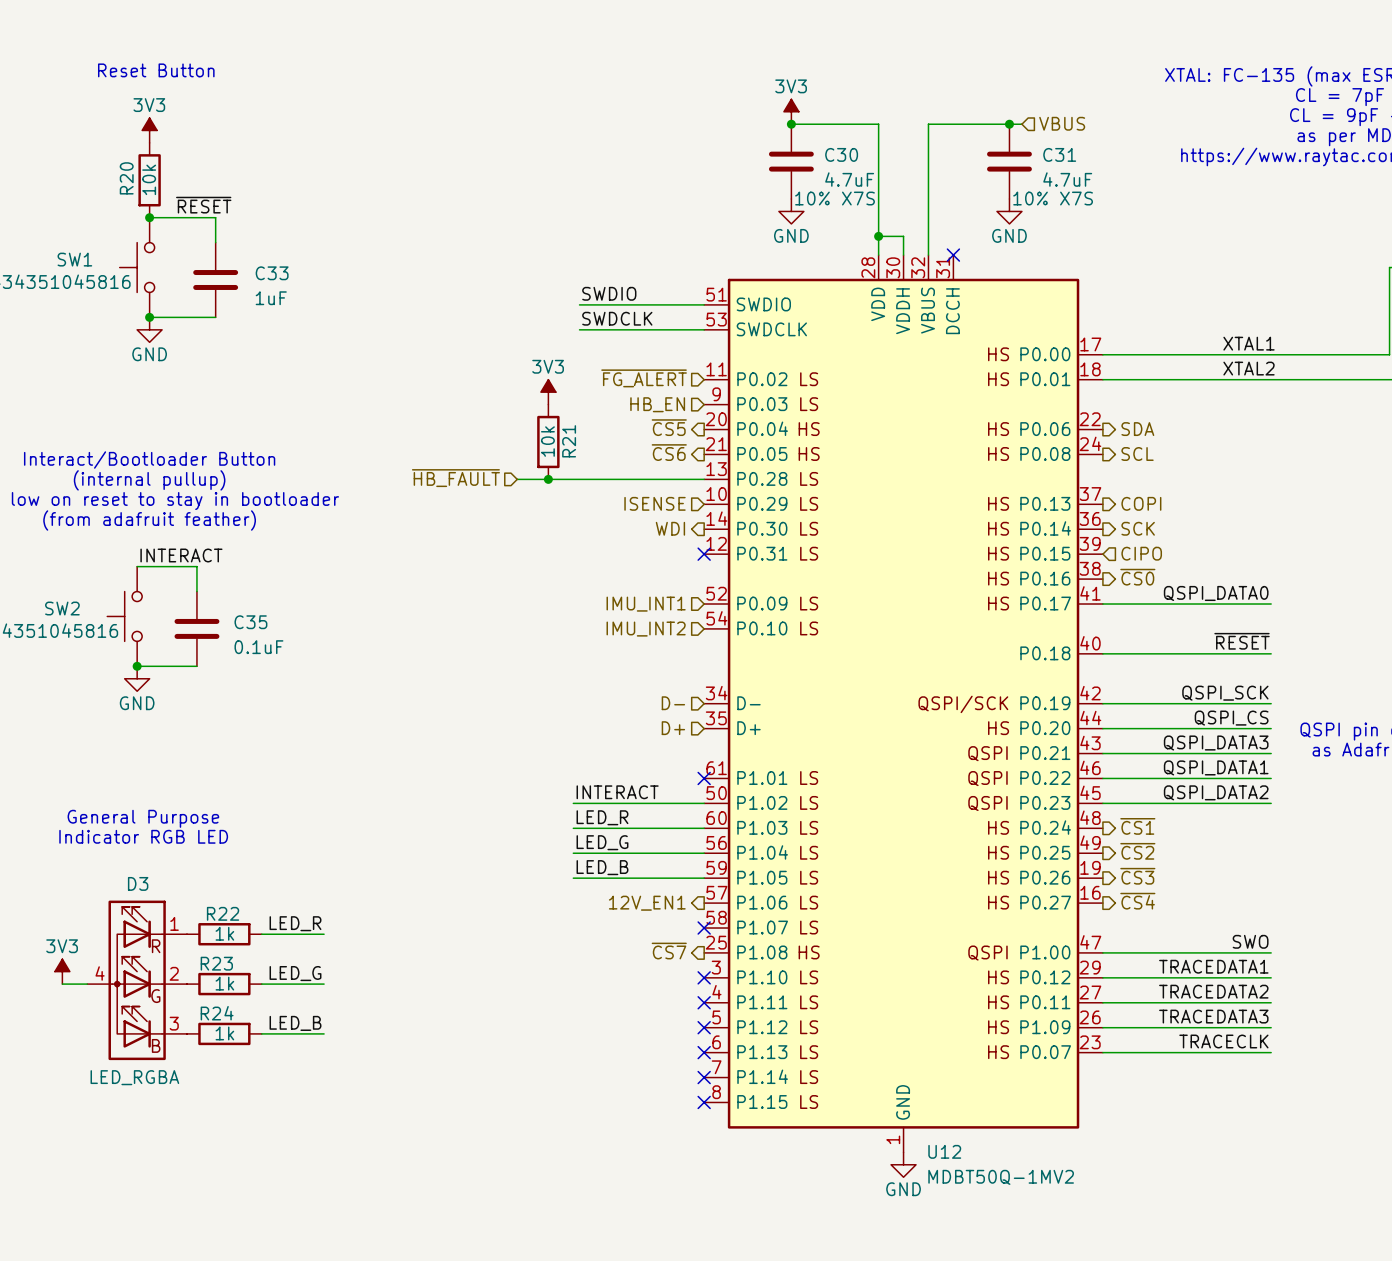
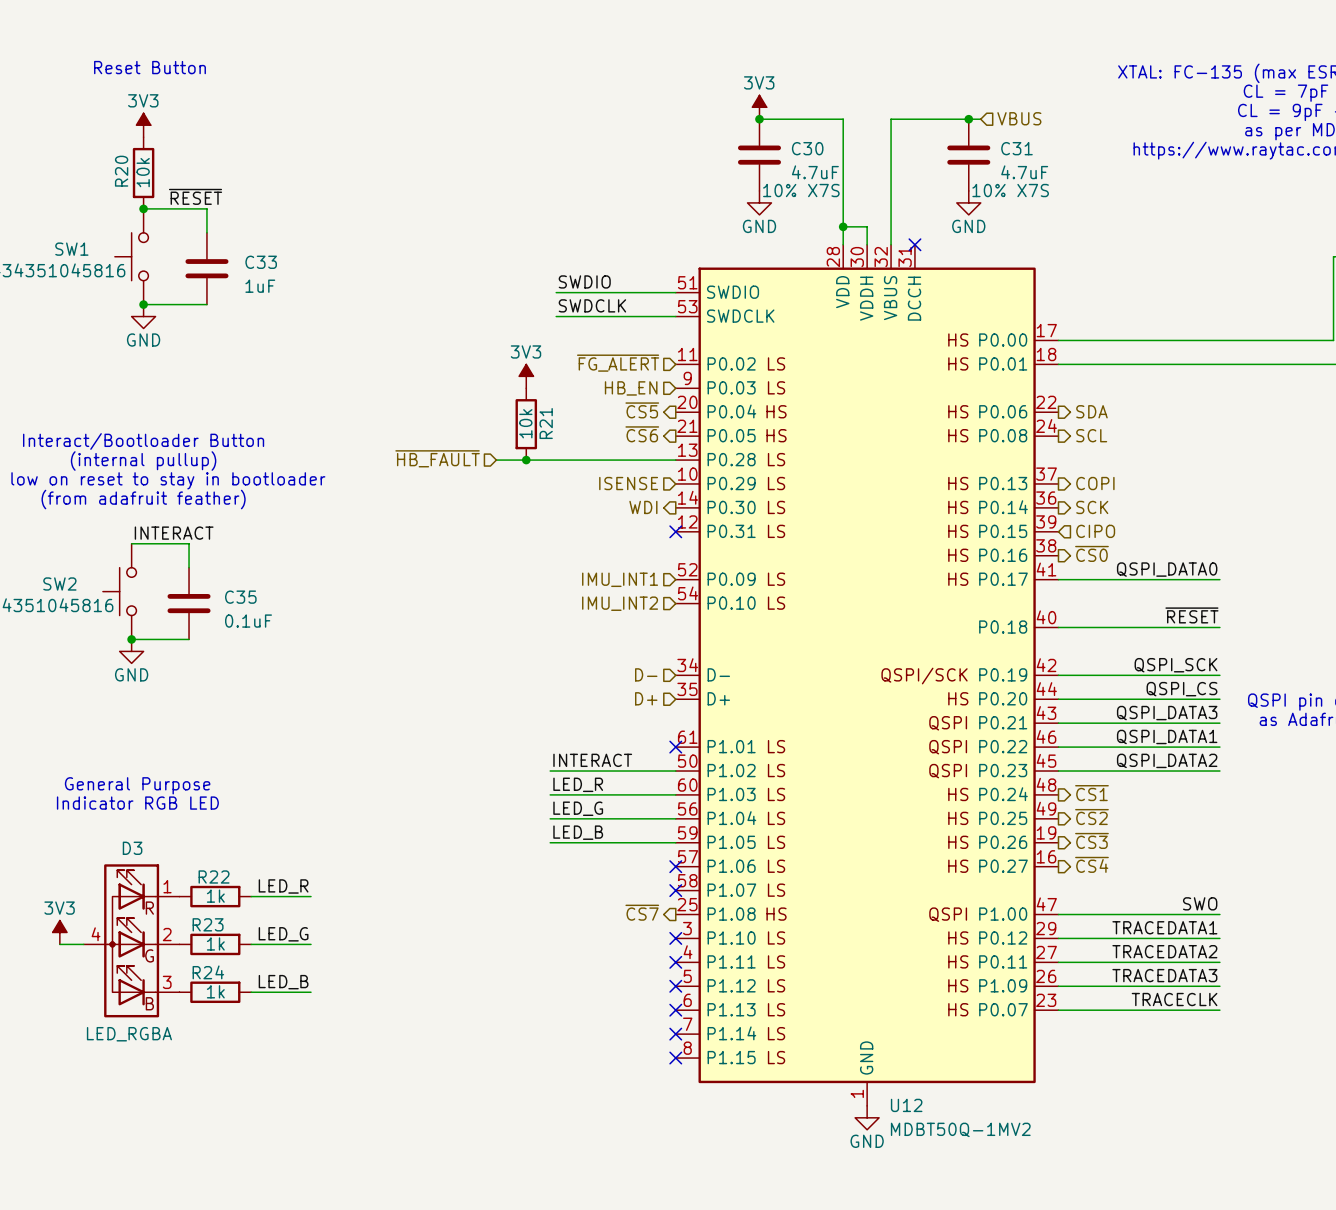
label: XTAL1 (1249, 343) -> none
label: XTAL2 (1249, 368) -> none
hierarchical label: 12V_EN1 (647, 903) -> none
no-connect mark: none -> (675, 866)

